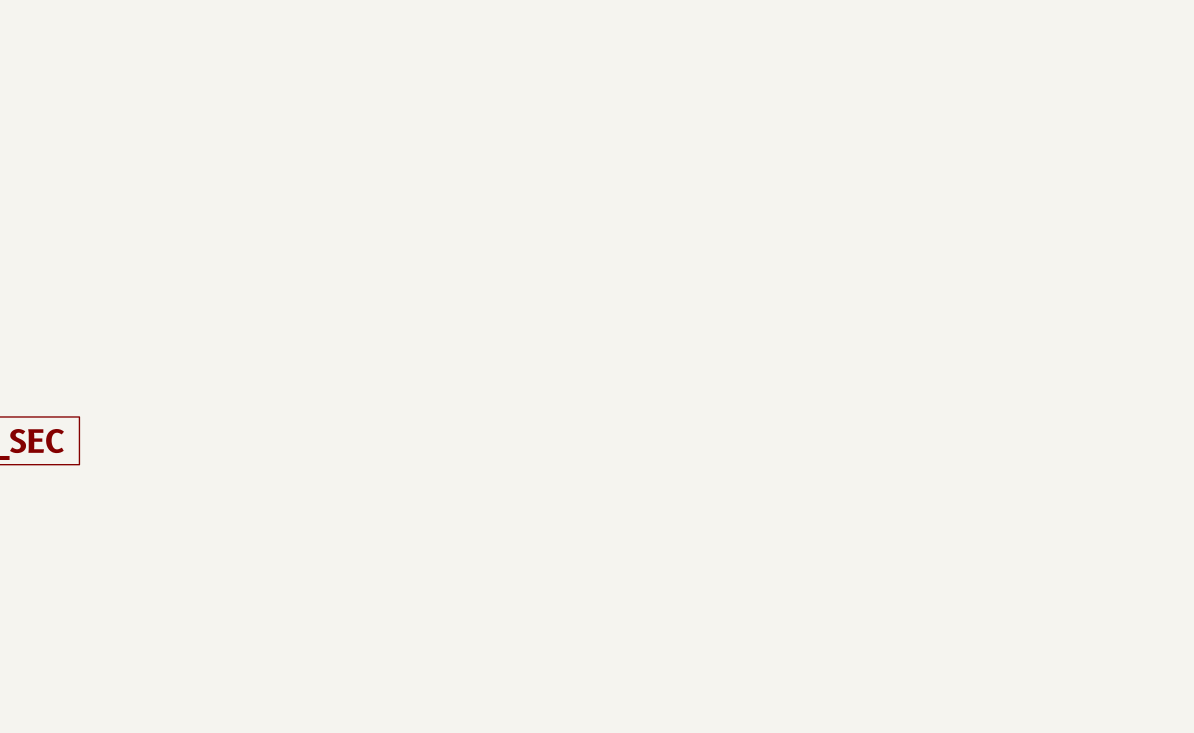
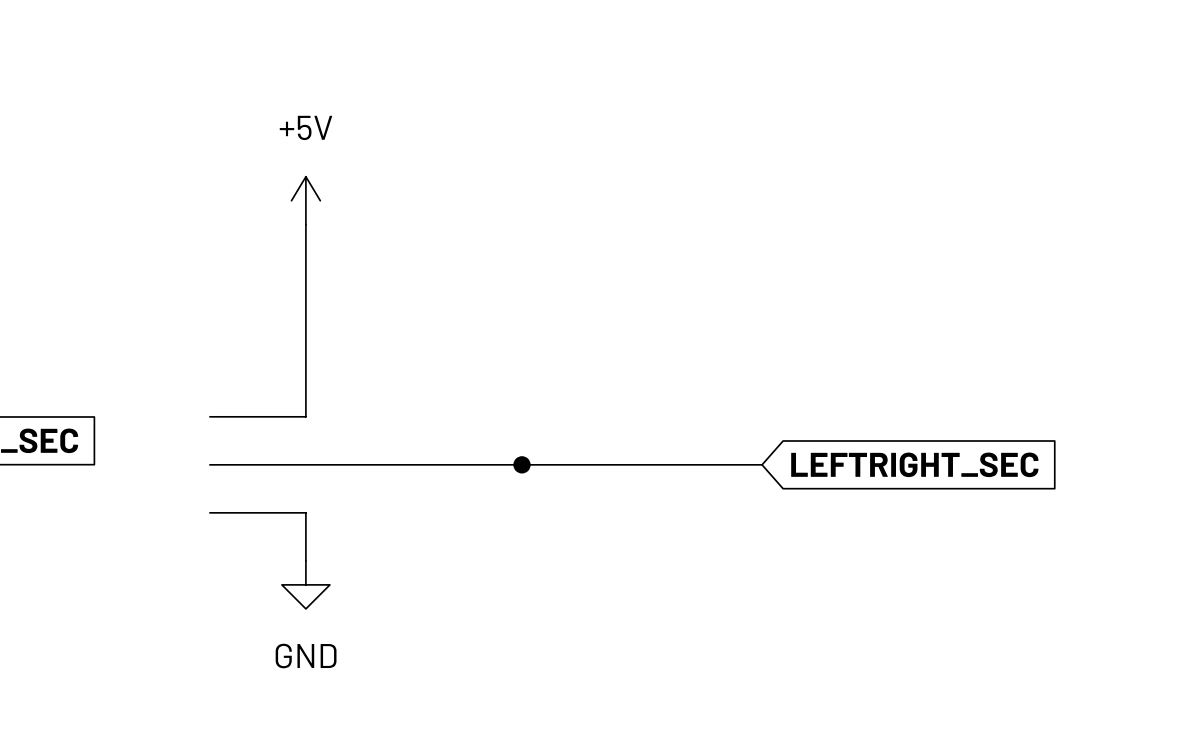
power symbol: none -> +5V (305, 200)
wire: none -> (305, 224) (305, 416) (209, 416)
wire: none -> (209, 464) (762, 464)
junction: none -> (521, 464)
global label: none -> LEFTRIGHT_SEC (914, 464)
wire: none -> (209, 512) (305, 512) (305, 560)
power symbol: none -> GND (305, 584)

